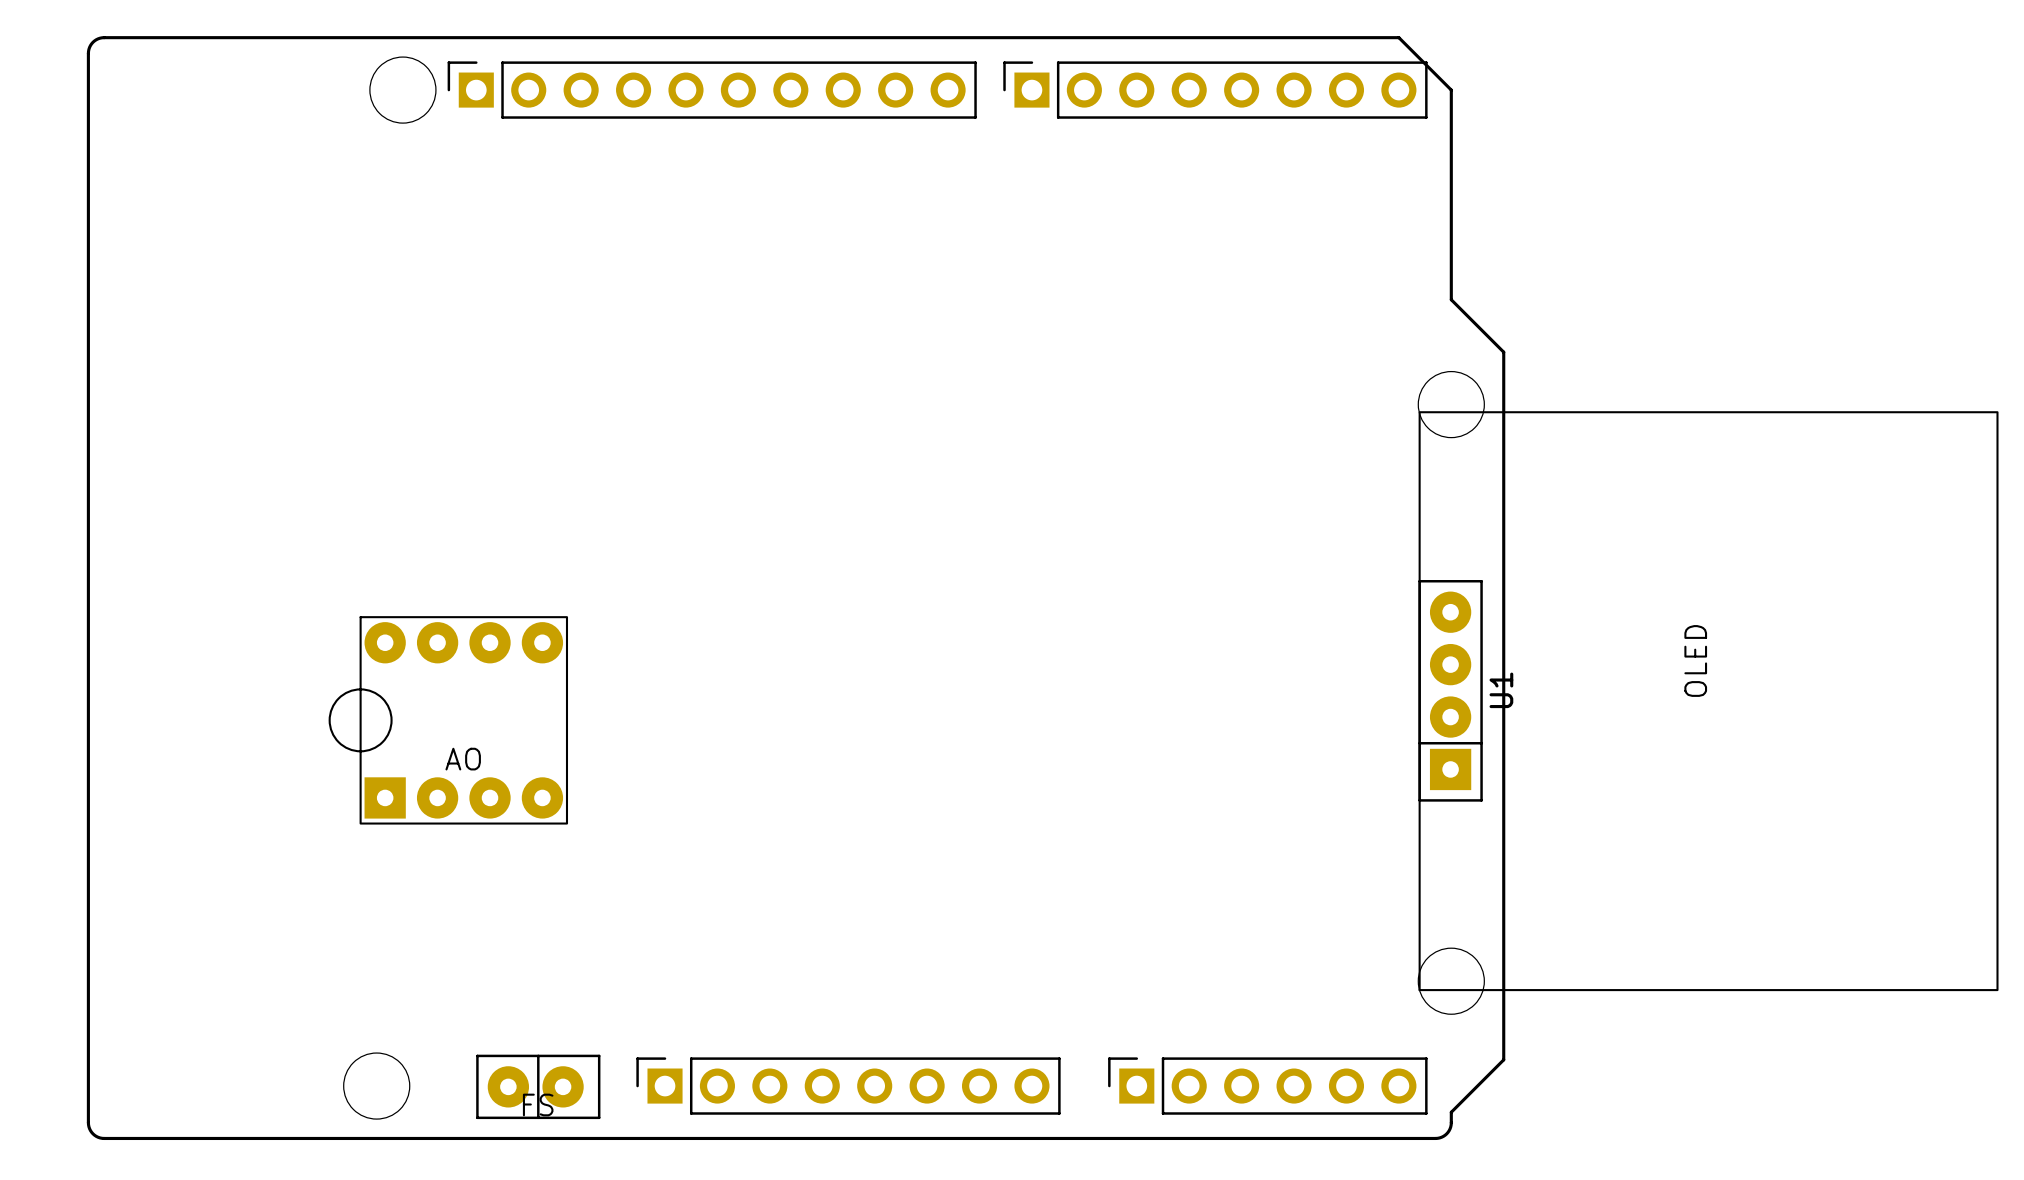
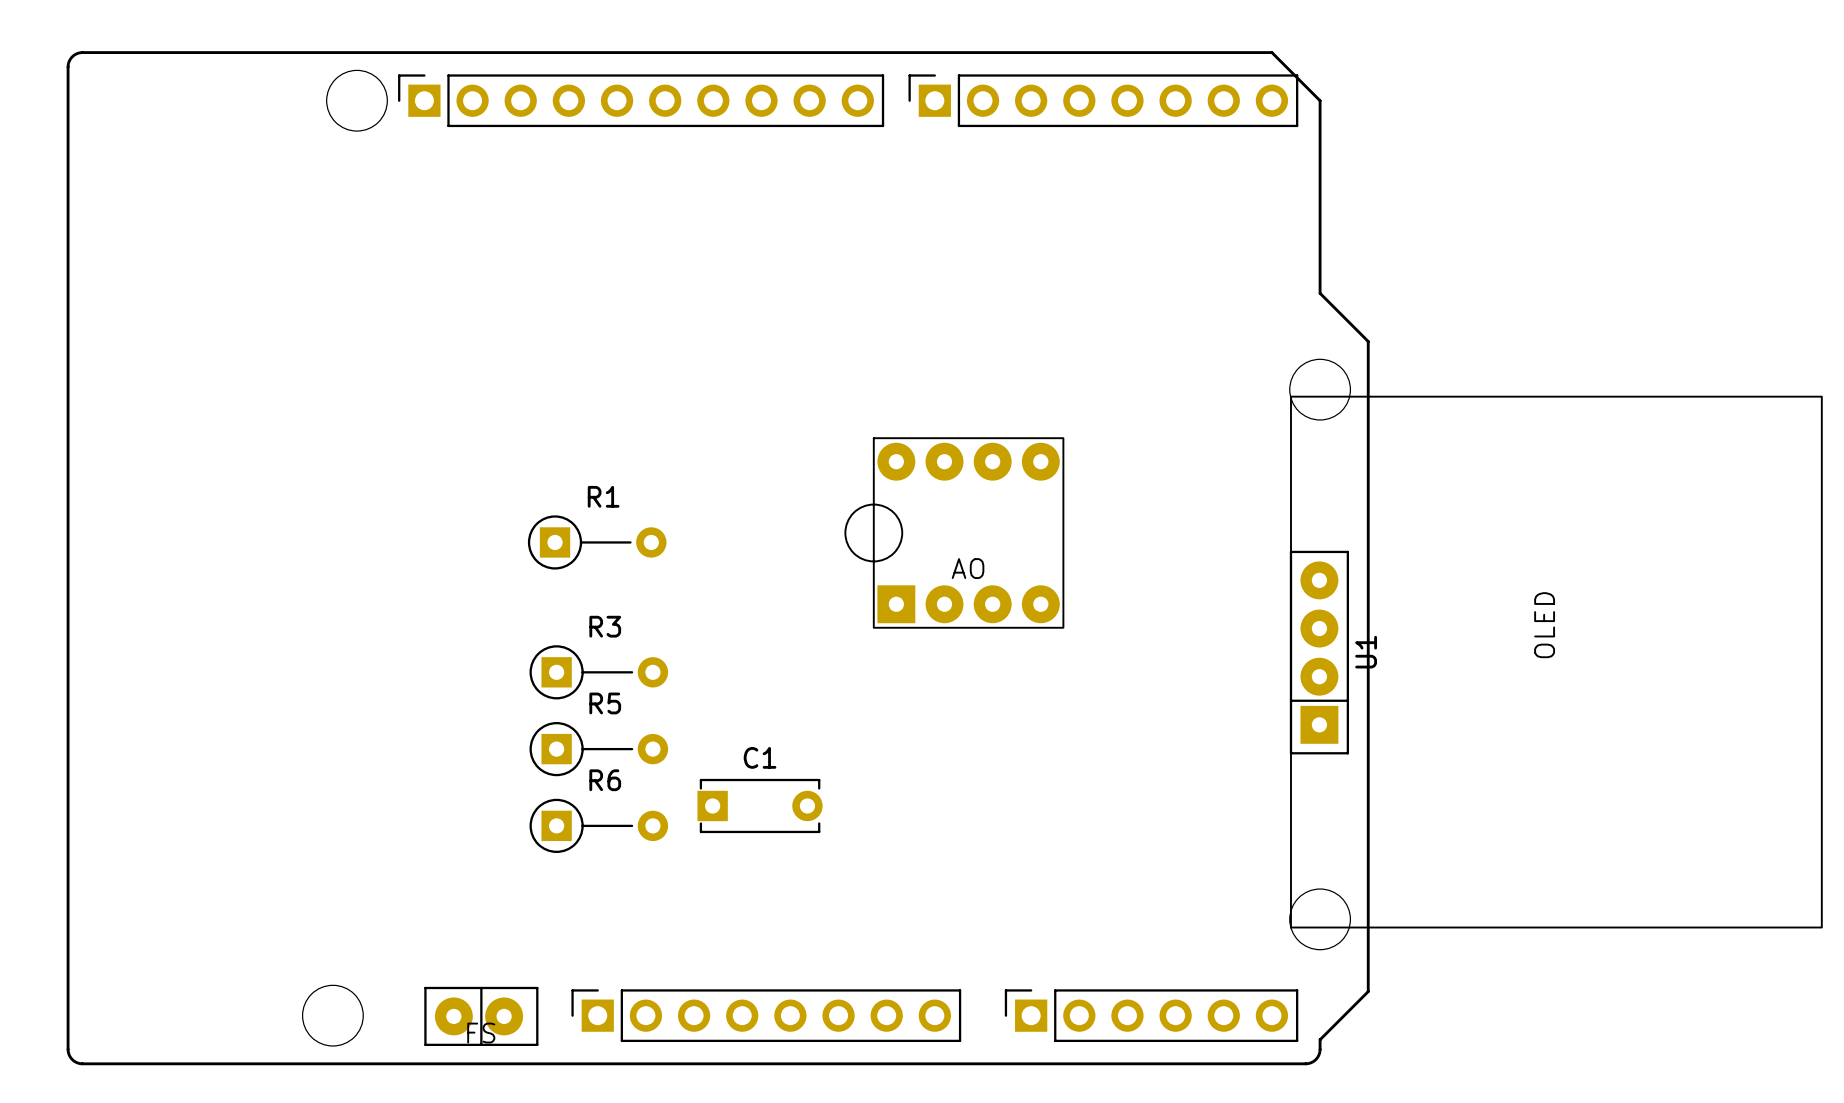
part: none -> (954, 532)
R1: none -> (597, 542)
R3: none -> (598, 672)
part: (448, 720) -> none
R5: none -> (598, 749)
C1: none -> (760, 805)
R6: none -> (598, 825)

